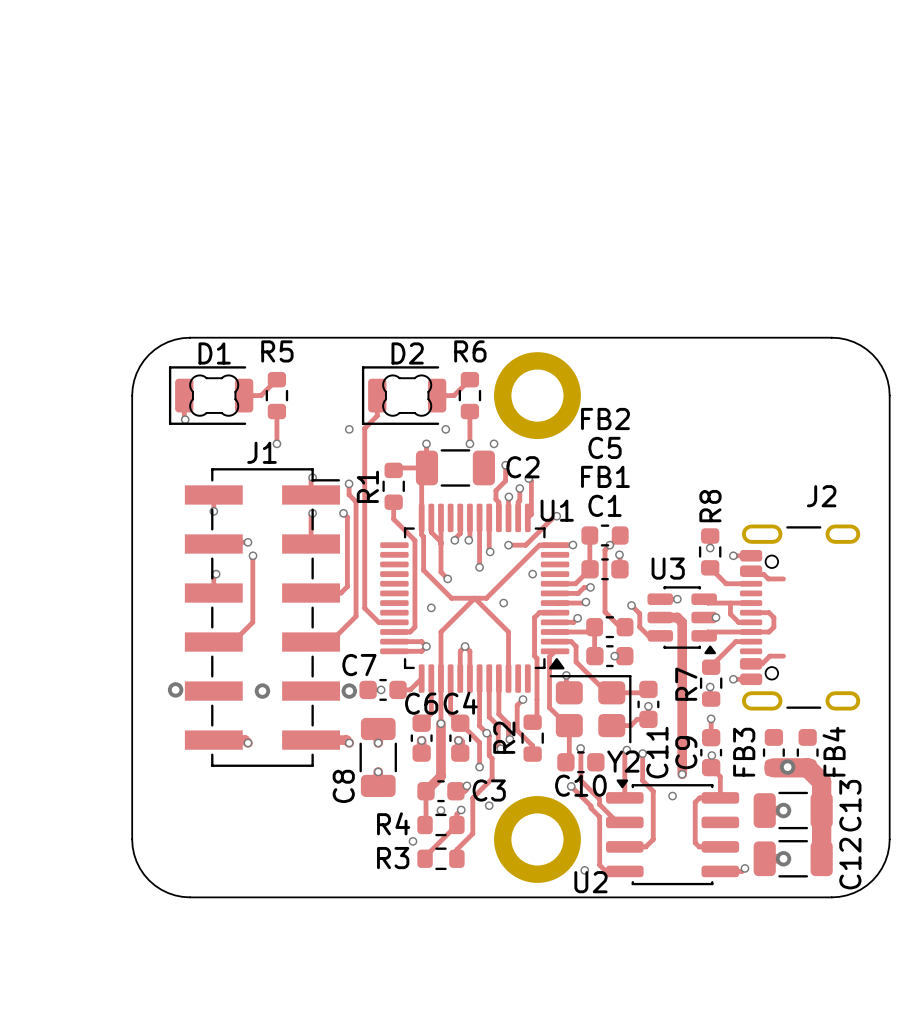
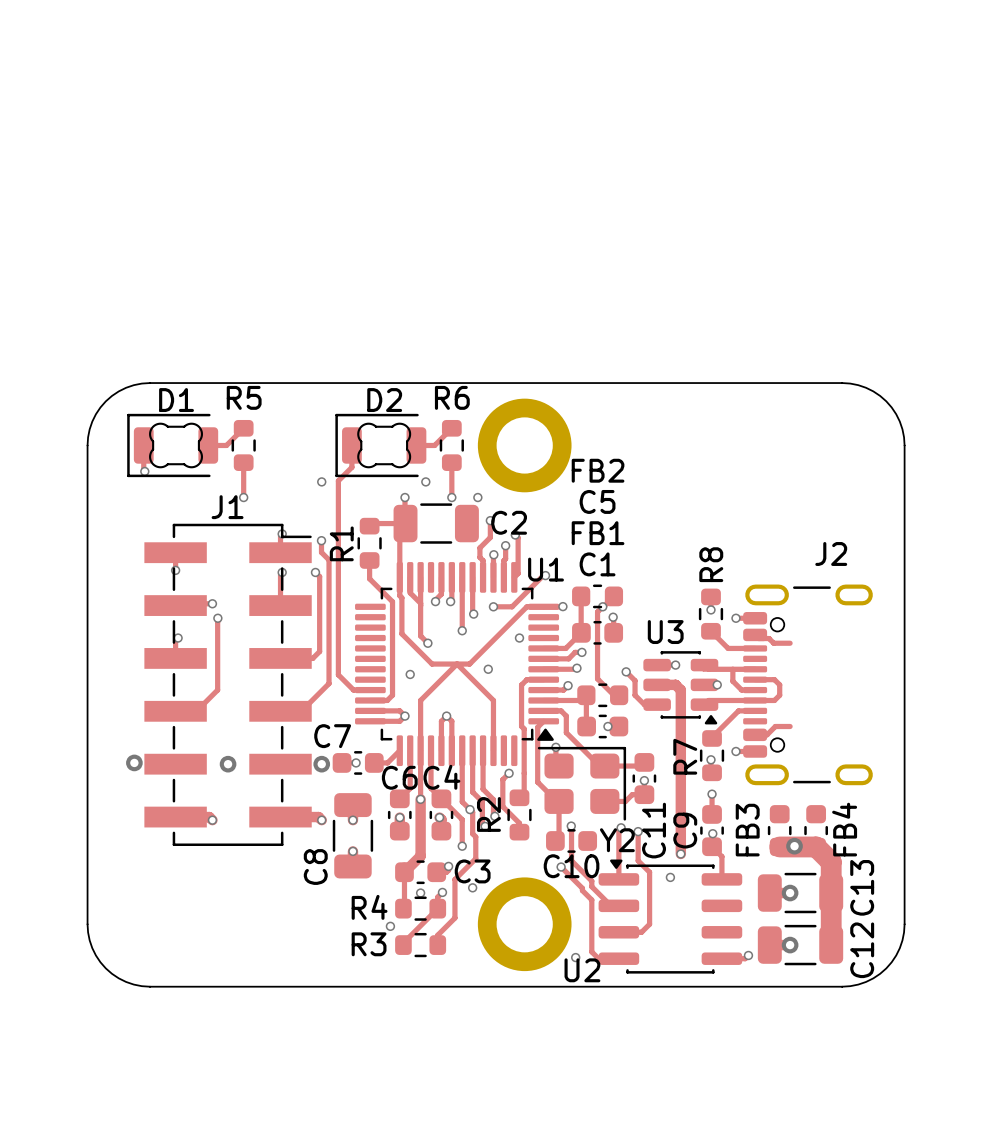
track: (720, 797) (699, 797) (695, 802) (695, 842) (699, 846) (720, 846) -> none

